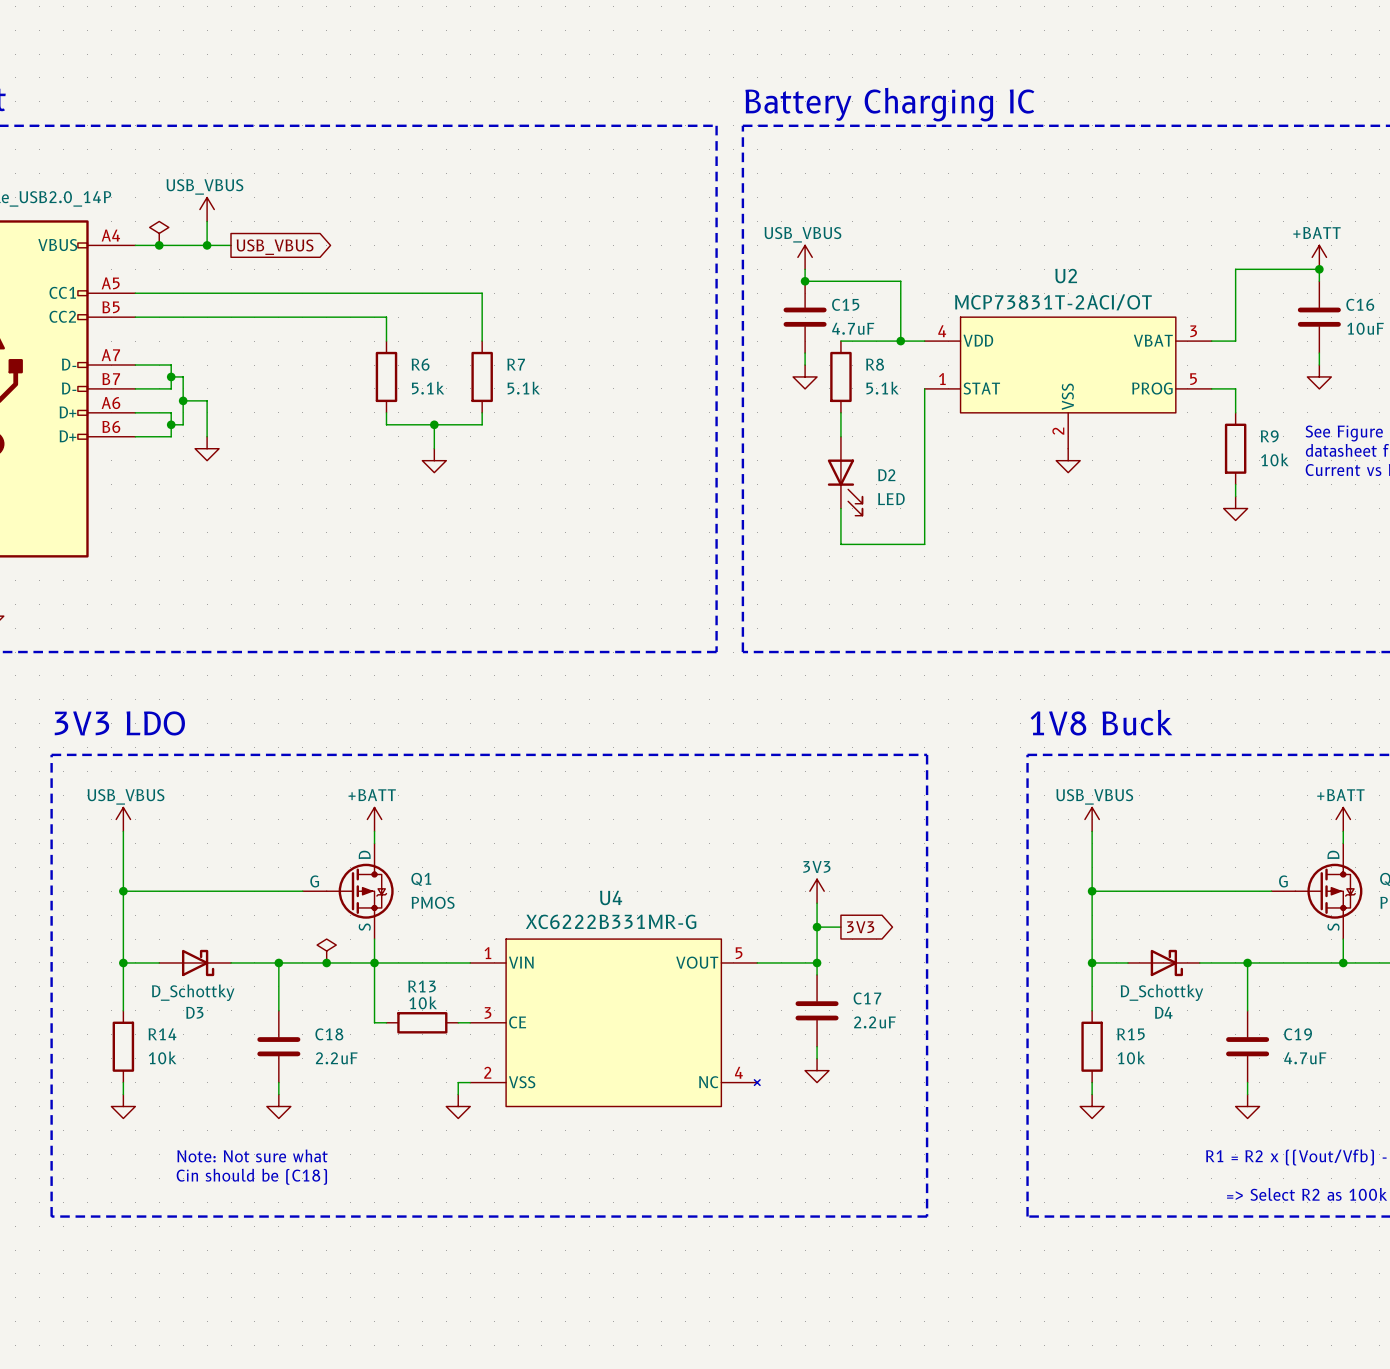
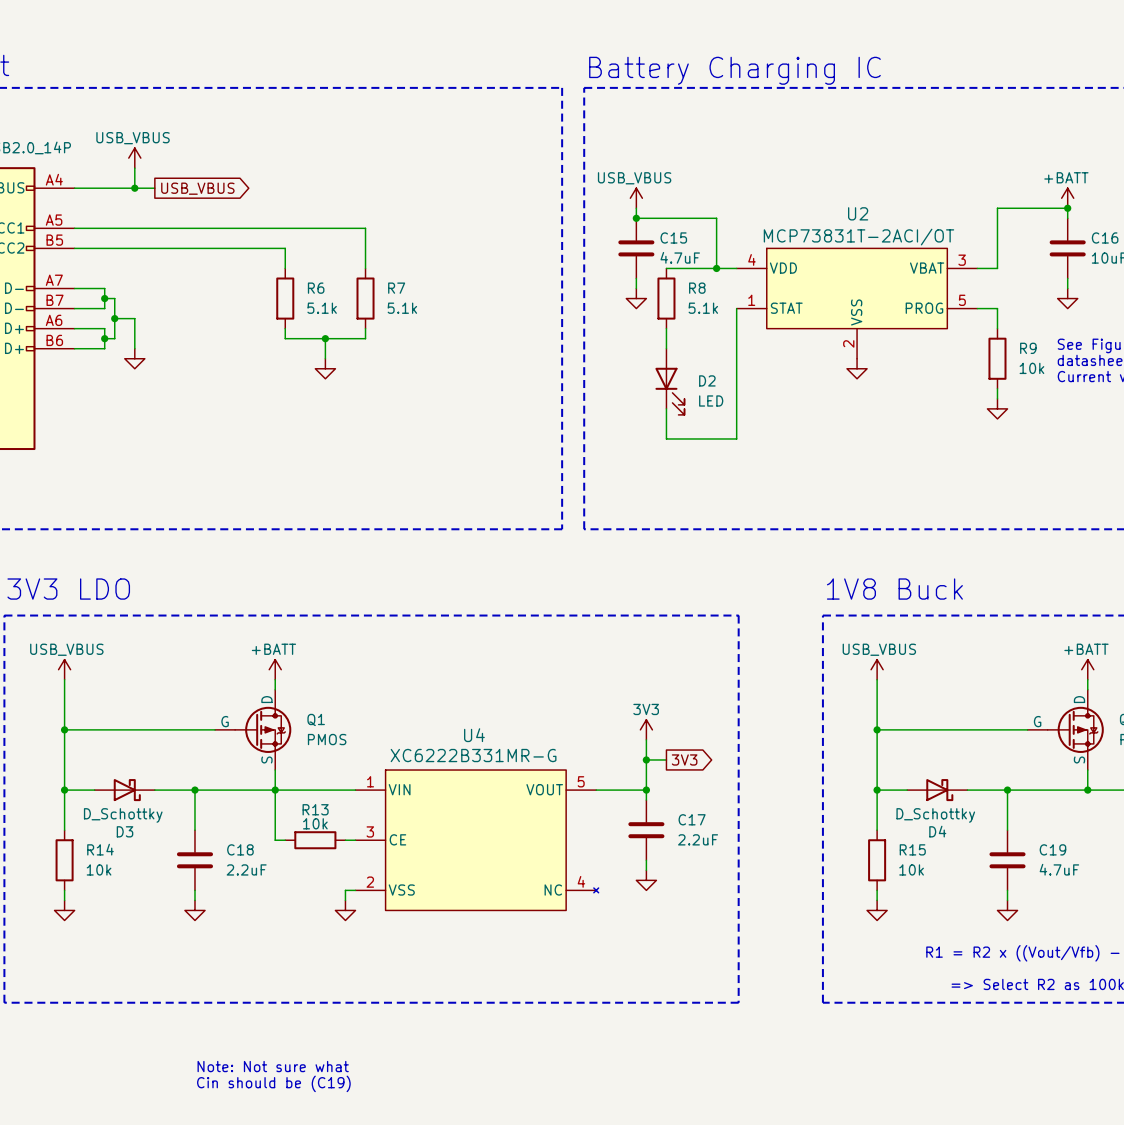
power symbol: (159, 233) -> none
junction: (159, 245) -> none
power symbol: (326, 951) -> none
junction: (326, 962) -> none
text position: Note: Not sure what (252, 1155) -> Note: Not sure what (273, 1066)
text: Cin should be (C18) (251, 1176) -> none
text: none -> Cin should be (C19) (273, 1083)

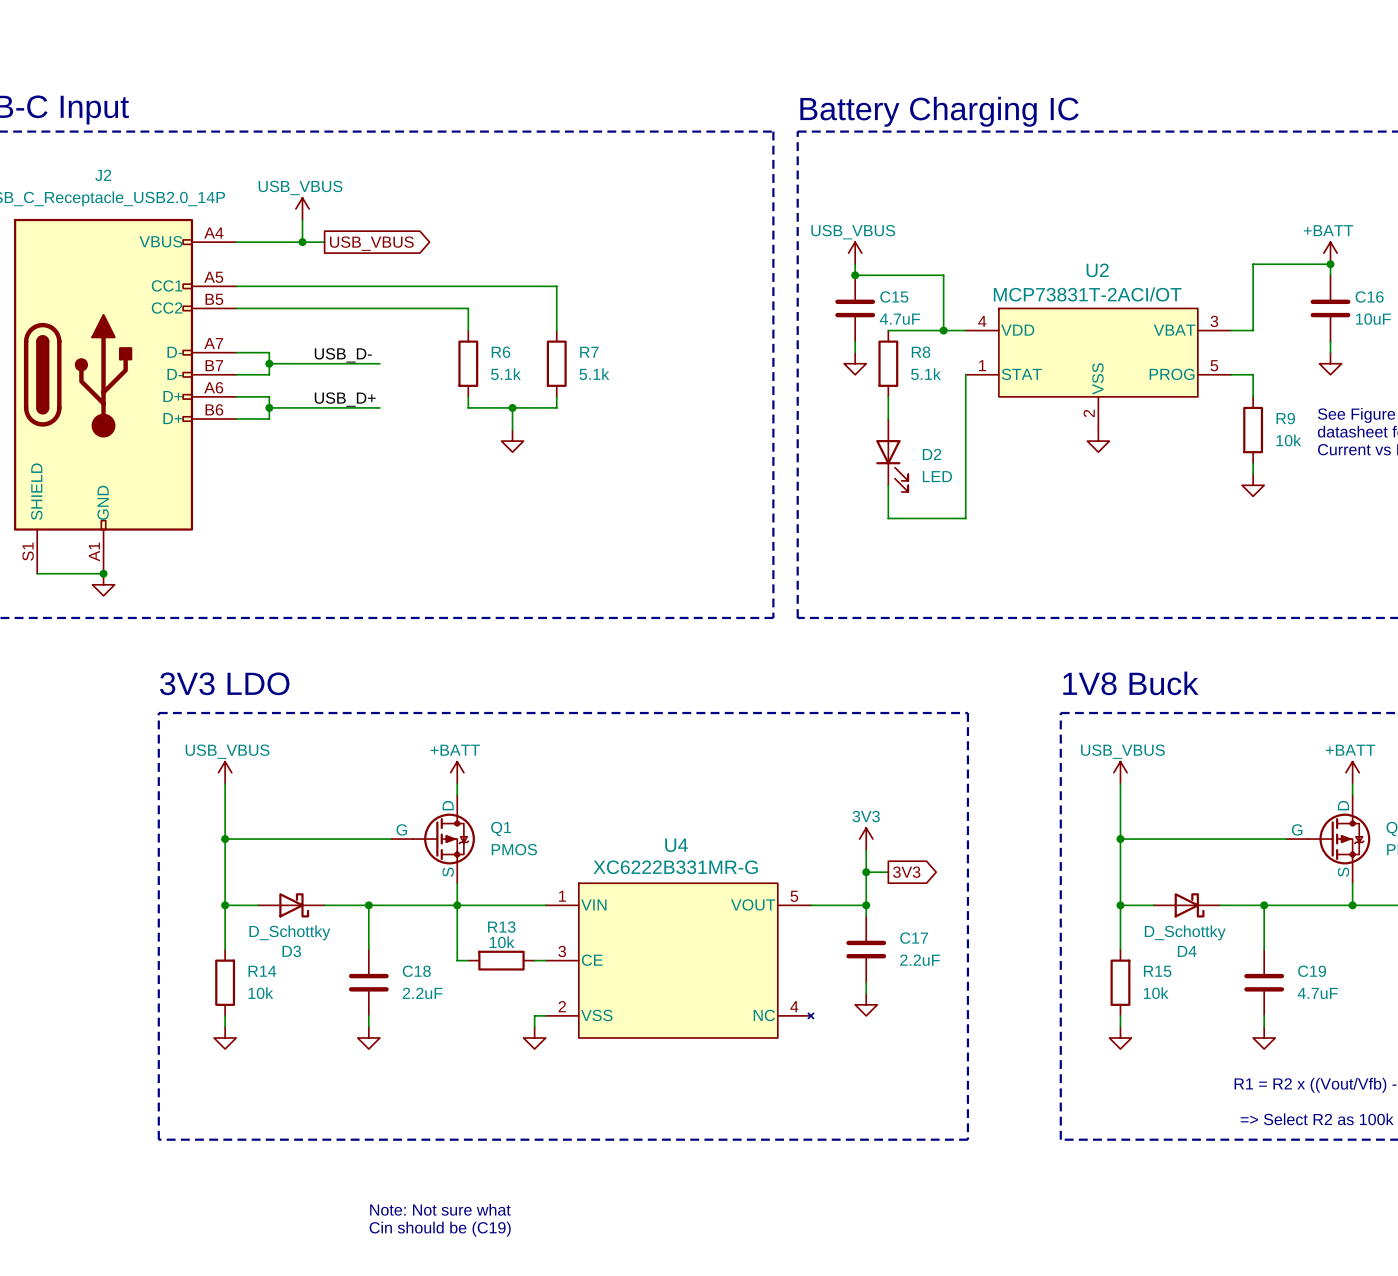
label: none -> USB_D- (343, 355)
wire: (114, 298) (114, 338) -> (280, 363) (379, 363)
wire: (114, 318) (134, 318) (134, 348) -> none
junction: (114, 318) -> none
label: none -> USB_D+ (345, 399)
wire: none -> (280, 407) (379, 407)
power symbol: (134, 358) -> none

